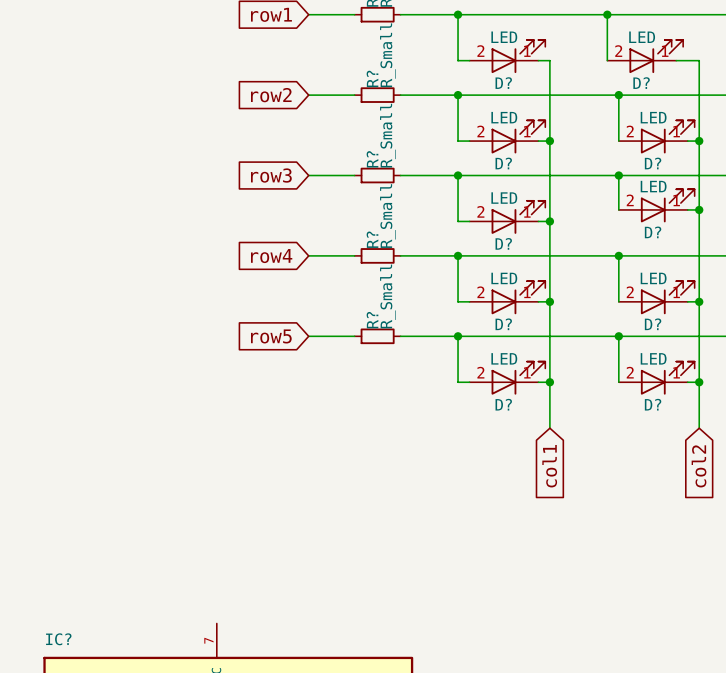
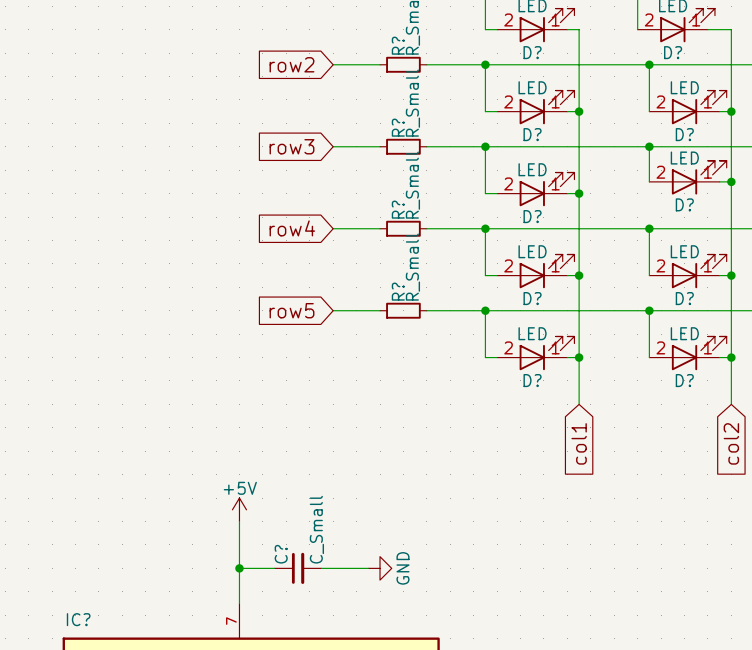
power symbol: none -> +5V (239, 509)
wire: none -> (239, 521) (239, 603)
wire: none -> (239, 568) (274, 568)
junction: none -> (239, 568)
C?: none -> C_Small (298, 568)
wire: none -> (321, 568) (368, 568)
power symbol: none -> GND (380, 568)

